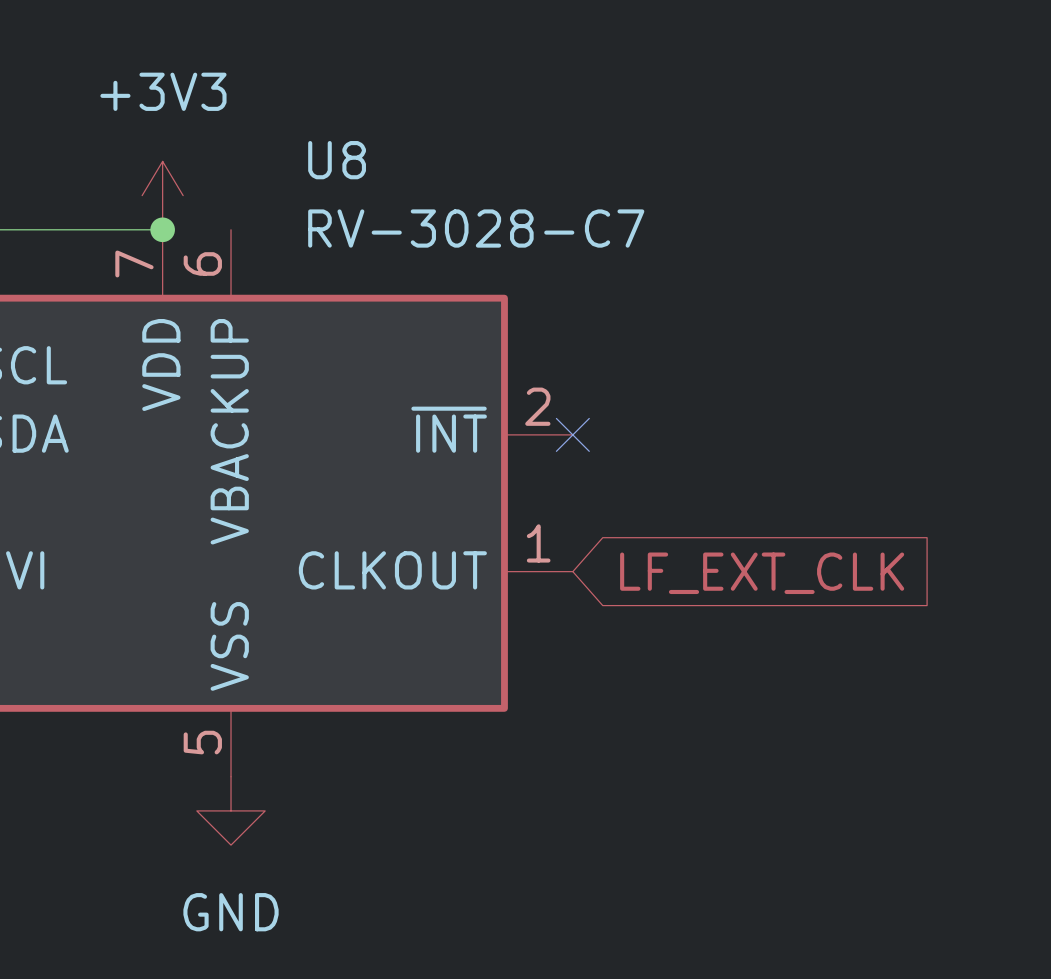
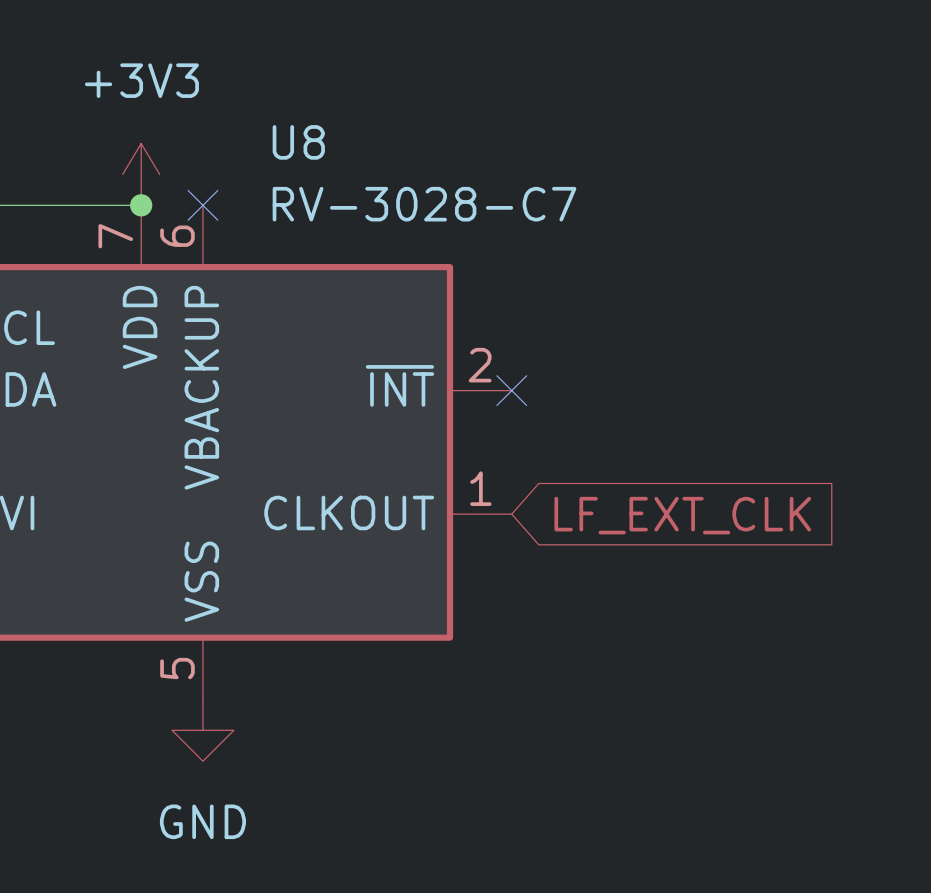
no-connect mark: none -> (202, 205)

